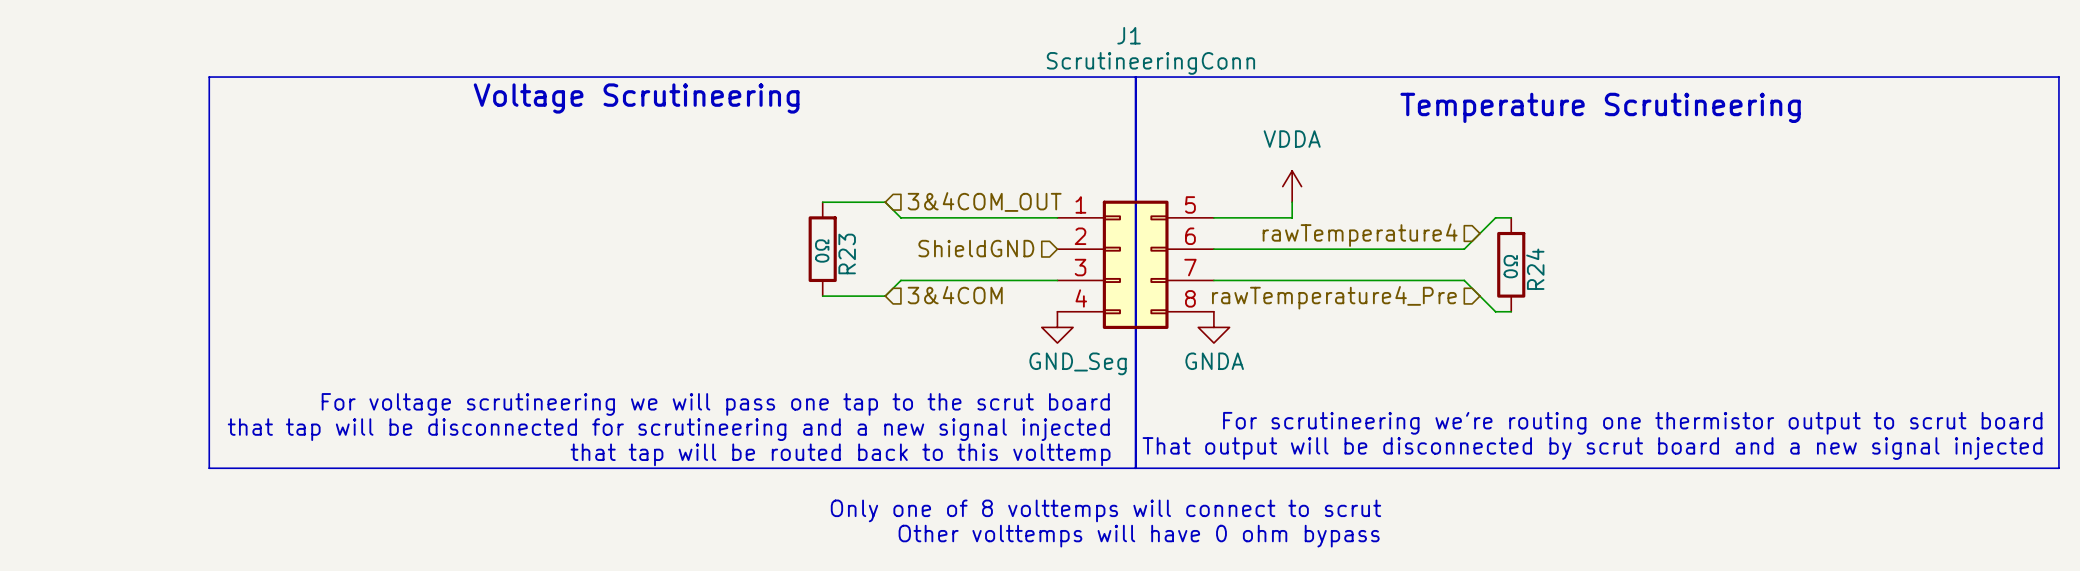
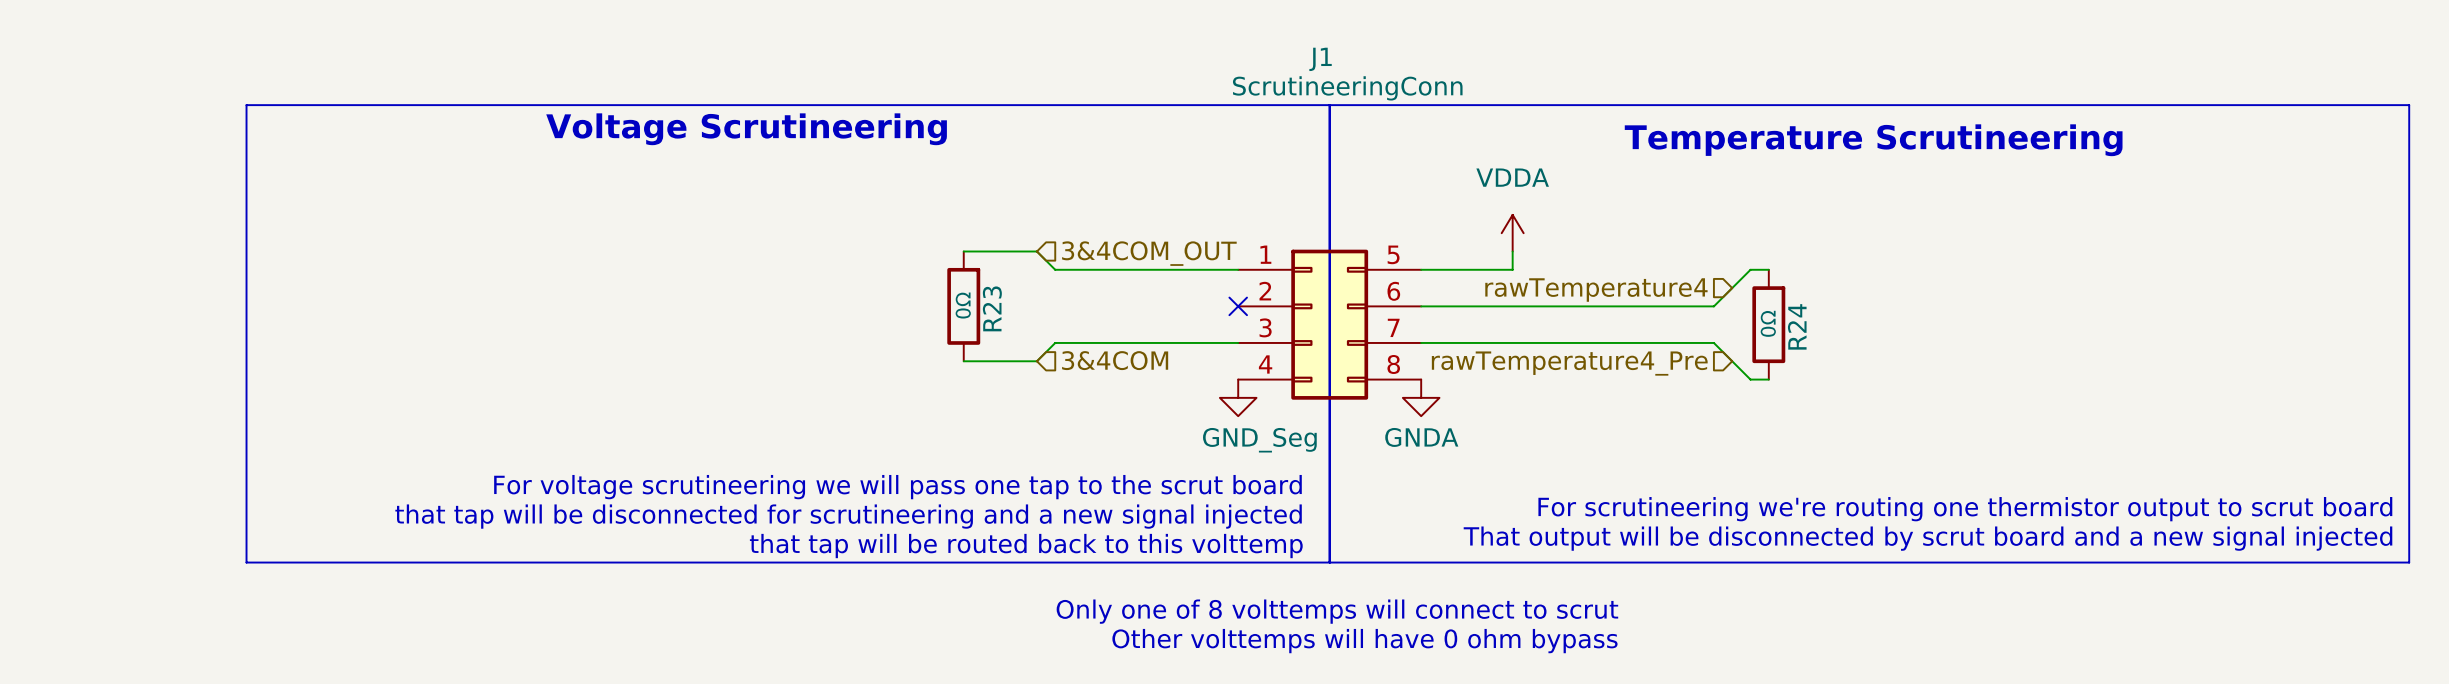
hierarchical label: ShieldGND (976, 248) -> none
no-connect mark: none -> (1238, 306)

